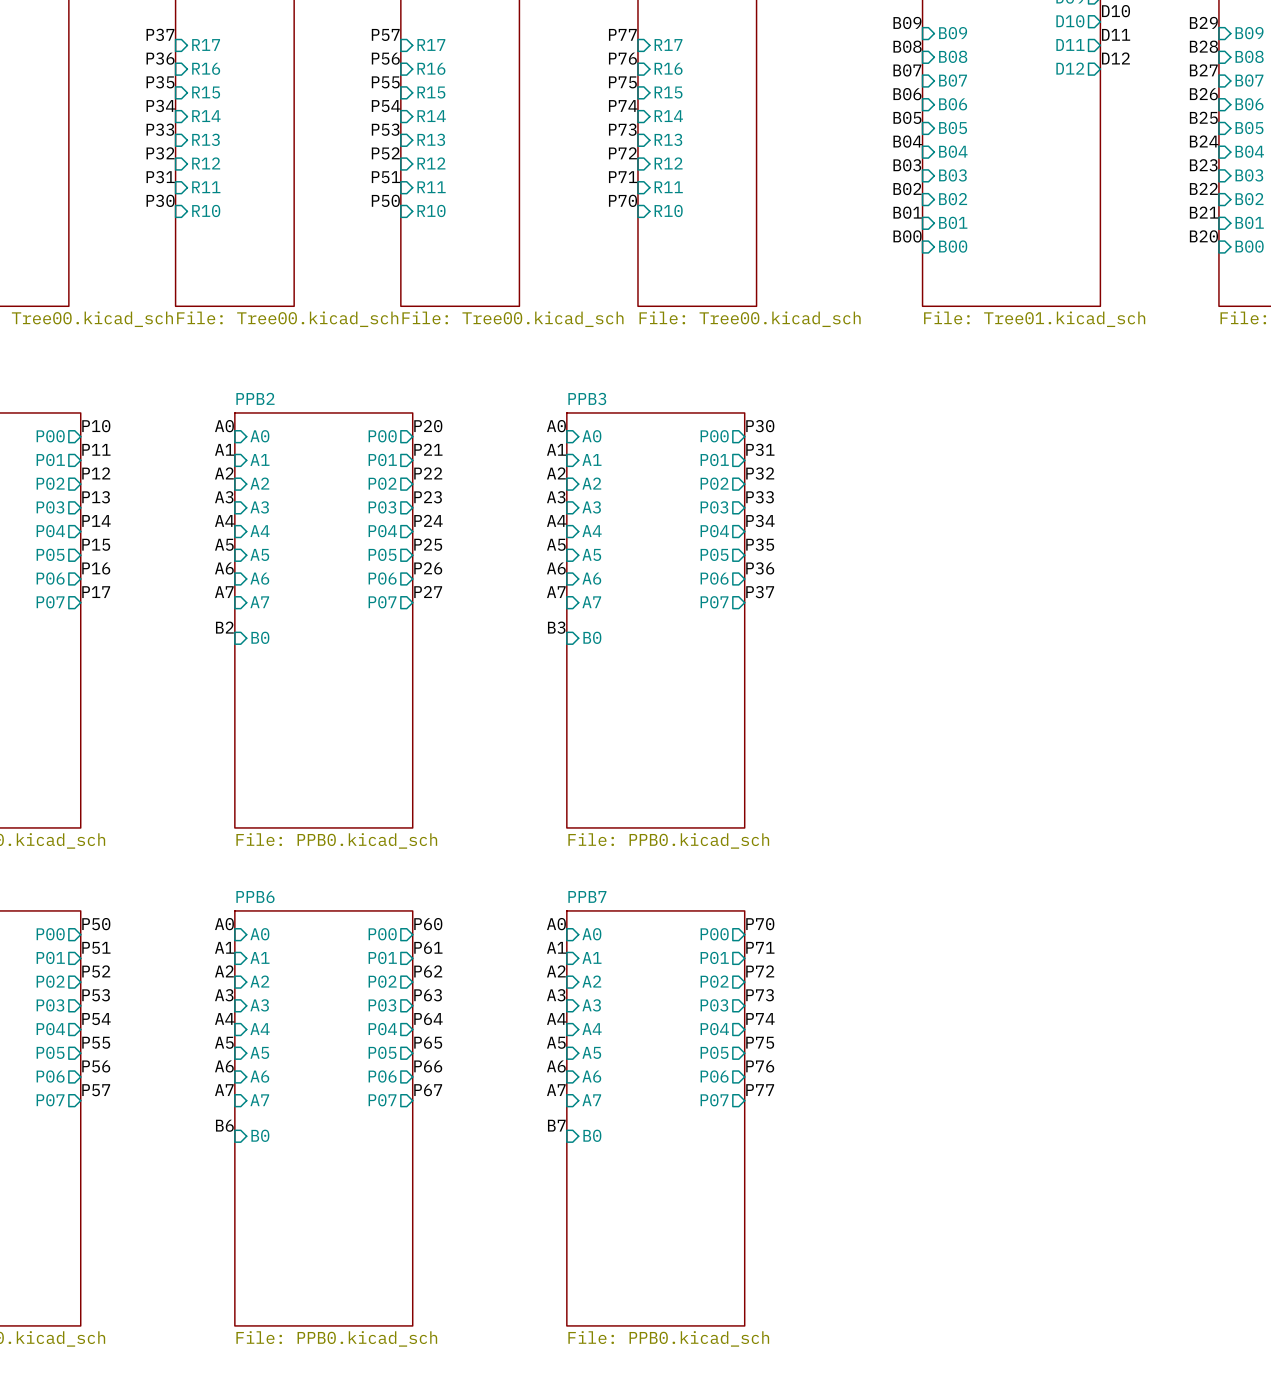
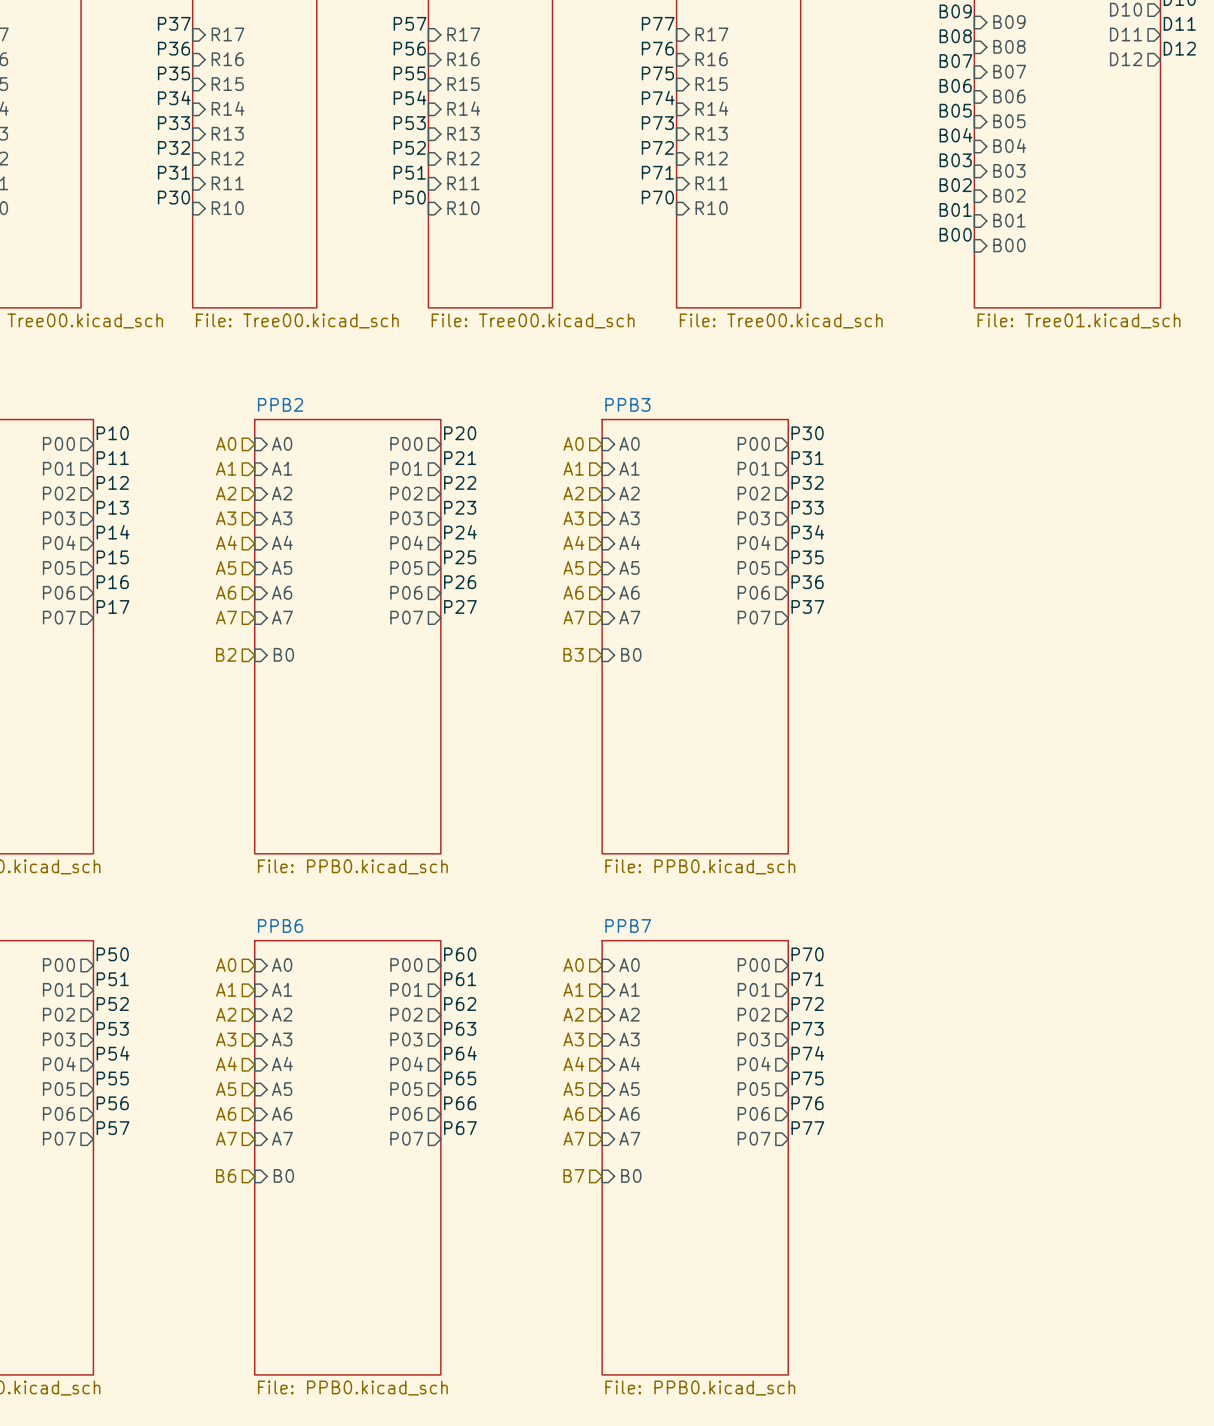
label: A0 (224, 426) -> none
label: A0 (556, 426) -> none
hierarchical label: none -> A0 (226, 443)
hierarchical label: none -> A0 (573, 443)
label: A1 (224, 449) -> none
label: A1 (556, 449) -> none
hierarchical label: none -> A1 (226, 468)
hierarchical label: none -> A1 (573, 468)
label: A2 (224, 473) -> none
label: A2 (556, 473) -> none
hierarchical label: none -> A2 (226, 493)
hierarchical label: none -> A2 (573, 493)
label: A3 (224, 497) -> none
label: A3 (556, 497) -> none
hierarchical label: none -> A3 (226, 518)
hierarchical label: none -> A3 (573, 518)
label: A4 (224, 520) -> none
label: A4 (556, 520) -> none
hierarchical label: none -> A4 (226, 542)
hierarchical label: none -> A4 (573, 542)
label: A5 (224, 544) -> none
label: A5 (556, 544) -> none
hierarchical label: none -> A5 (226, 567)
hierarchical label: none -> A5 (573, 567)
label: A6 (224, 568) -> none
label: A6 (556, 568) -> none
hierarchical label: none -> A6 (226, 592)
hierarchical label: none -> A6 (573, 592)
label: A7 (224, 592) -> none
label: A7 (556, 592) -> none
hierarchical label: none -> A7 (226, 617)
hierarchical label: none -> A7 (573, 617)
label: B2 (224, 627) -> none
label: B3 (556, 627) -> none
hierarchical label: none -> B2 (226, 654)
hierarchical label: none -> B3 (573, 654)
label: A0 (224, 924) -> none
label: A0 (556, 924) -> none
hierarchical label: none -> A0 (226, 965)
hierarchical label: none -> A0 (573, 965)
label: A1 (224, 947) -> none
label: A1 (556, 947) -> none
hierarchical label: none -> A1 (226, 989)
hierarchical label: none -> A1 (573, 989)
label: A2 (224, 971) -> none
label: A2 (556, 971) -> none
hierarchical label: none -> A2 (226, 1014)
hierarchical label: none -> A2 (573, 1014)
label: A3 (224, 995) -> none
label: A3 (556, 995) -> none
hierarchical label: none -> A3 (226, 1039)
hierarchical label: none -> A3 (573, 1039)
label: A4 (224, 1018) -> none
label: A4 (556, 1018) -> none
hierarchical label: none -> A4 (226, 1063)
hierarchical label: none -> A4 (573, 1063)
label: A5 (224, 1042) -> none
label: A5 (556, 1042) -> none
hierarchical label: none -> A5 (226, 1089)
hierarchical label: none -> A5 (573, 1089)
label: A6 (224, 1066) -> none
label: A6 (556, 1066) -> none
hierarchical label: none -> A6 (226, 1113)
hierarchical label: none -> A6 (573, 1113)
label: A7 (224, 1090) -> none
label: A7 (556, 1090) -> none
hierarchical label: none -> A7 (226, 1138)
hierarchical label: none -> A7 (573, 1138)
label: B6 (224, 1125) -> none
label: B7 (556, 1125) -> none
hierarchical label: none -> B6 (226, 1175)
hierarchical label: none -> B7 (573, 1175)

